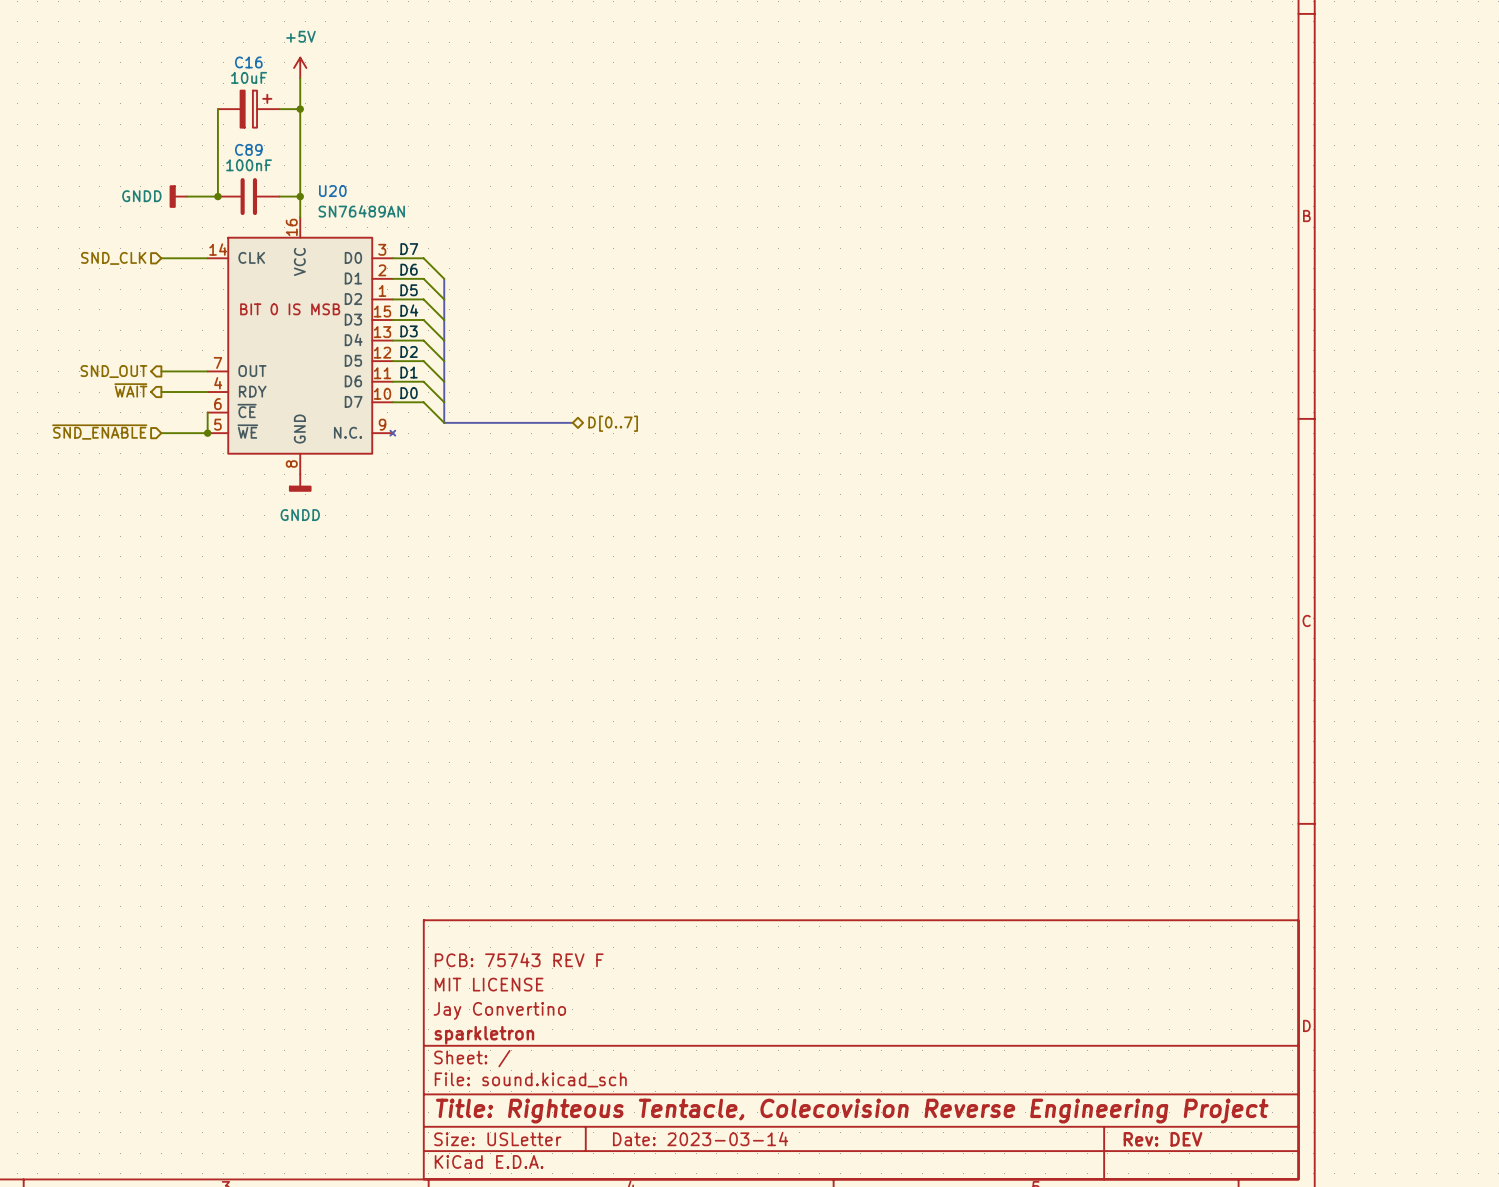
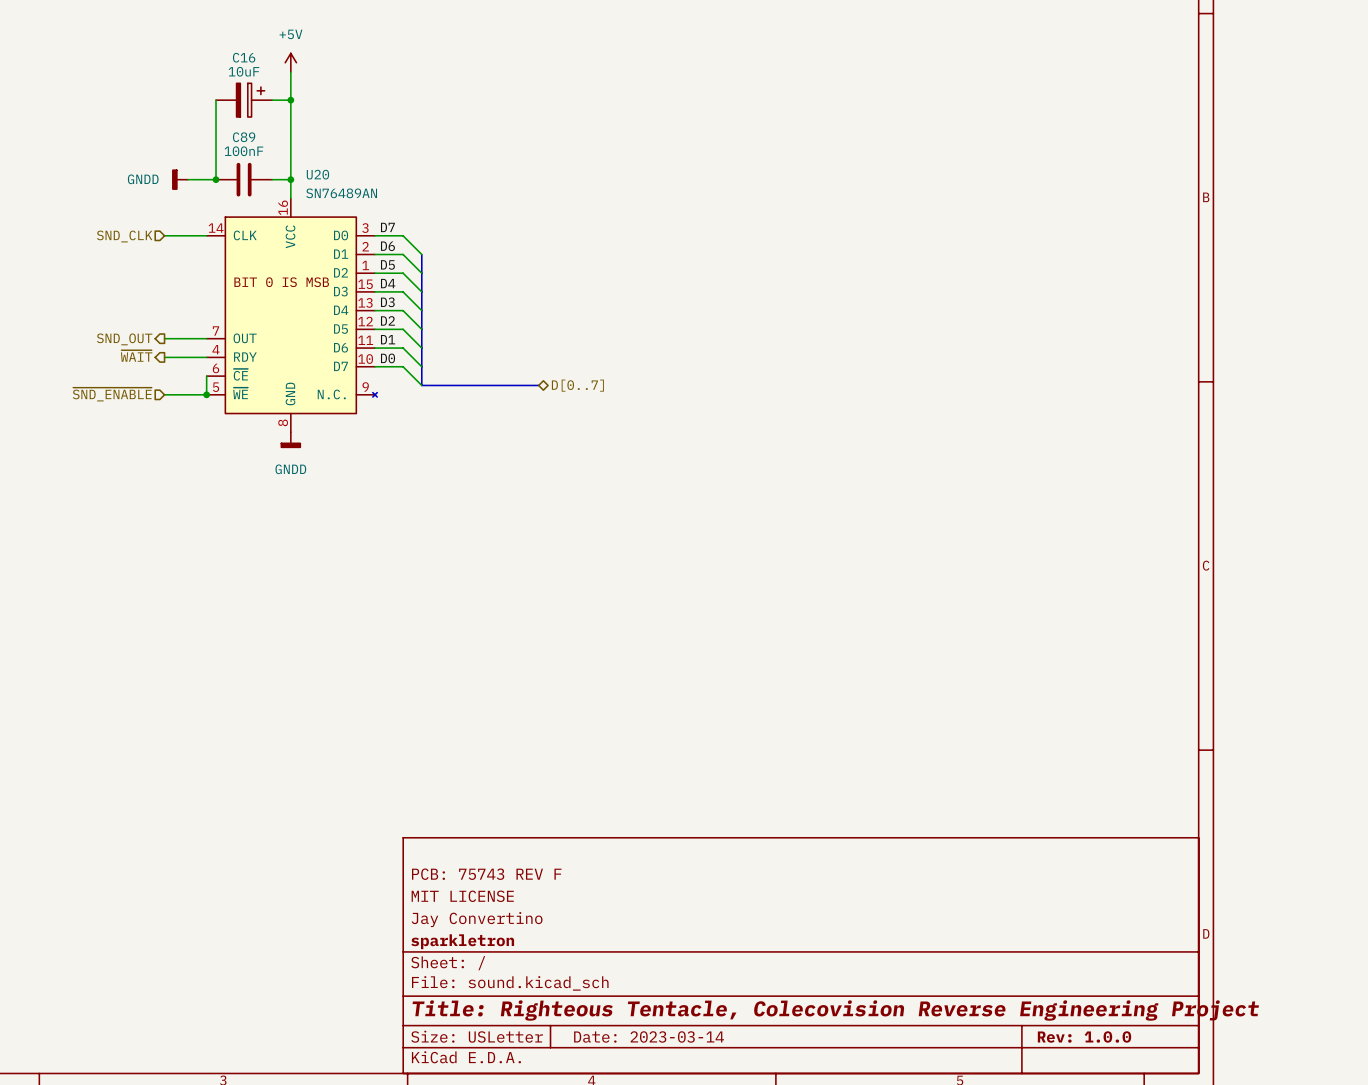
title block: Rev: DEV (1163, 1139) -> Rev: 1.0.0 (1084, 1036)

